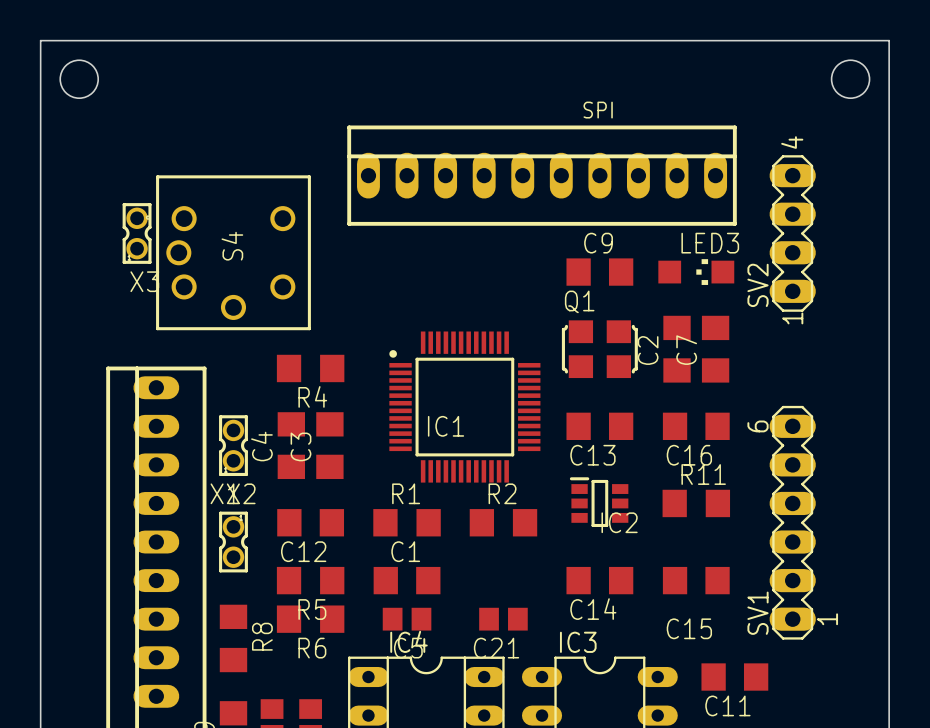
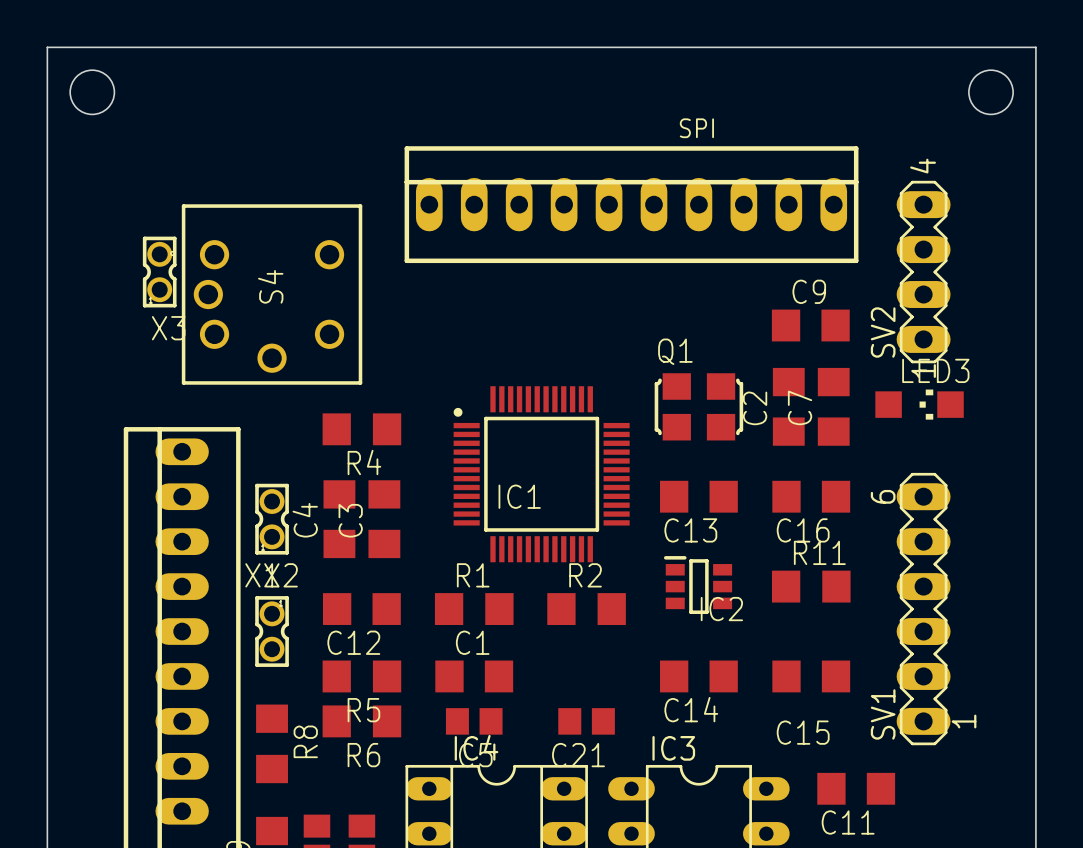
C9 position: (599, 272) -> (810, 325)
LED3 position: (696, 272) -> (919, 404)

